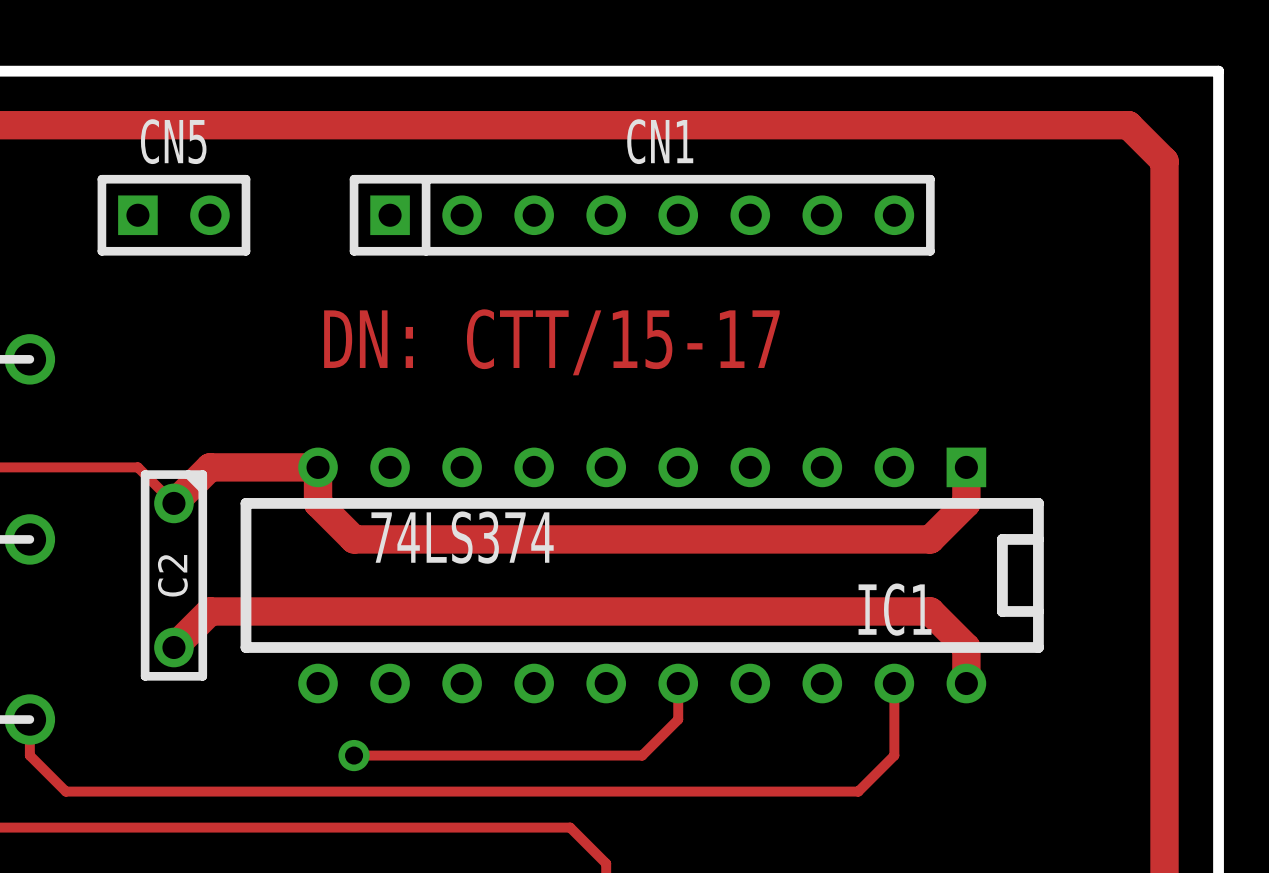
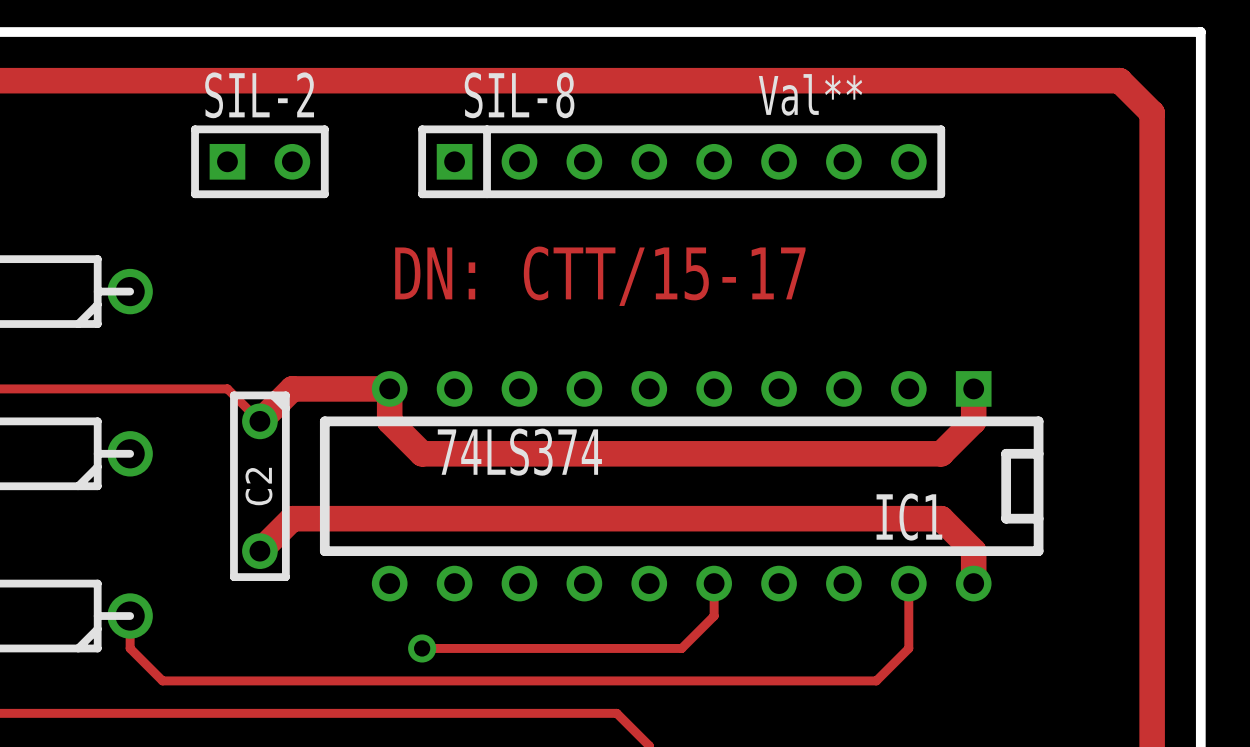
SIL-2 name: none -> SIL-2 (259, 95)
SIL-2 value: CN5 (173, 141) -> none
SIL-8 name: none -> SIL-8 (519, 95)
SIL-8 value: CN1 (660, 141) -> Val** (810, 94)

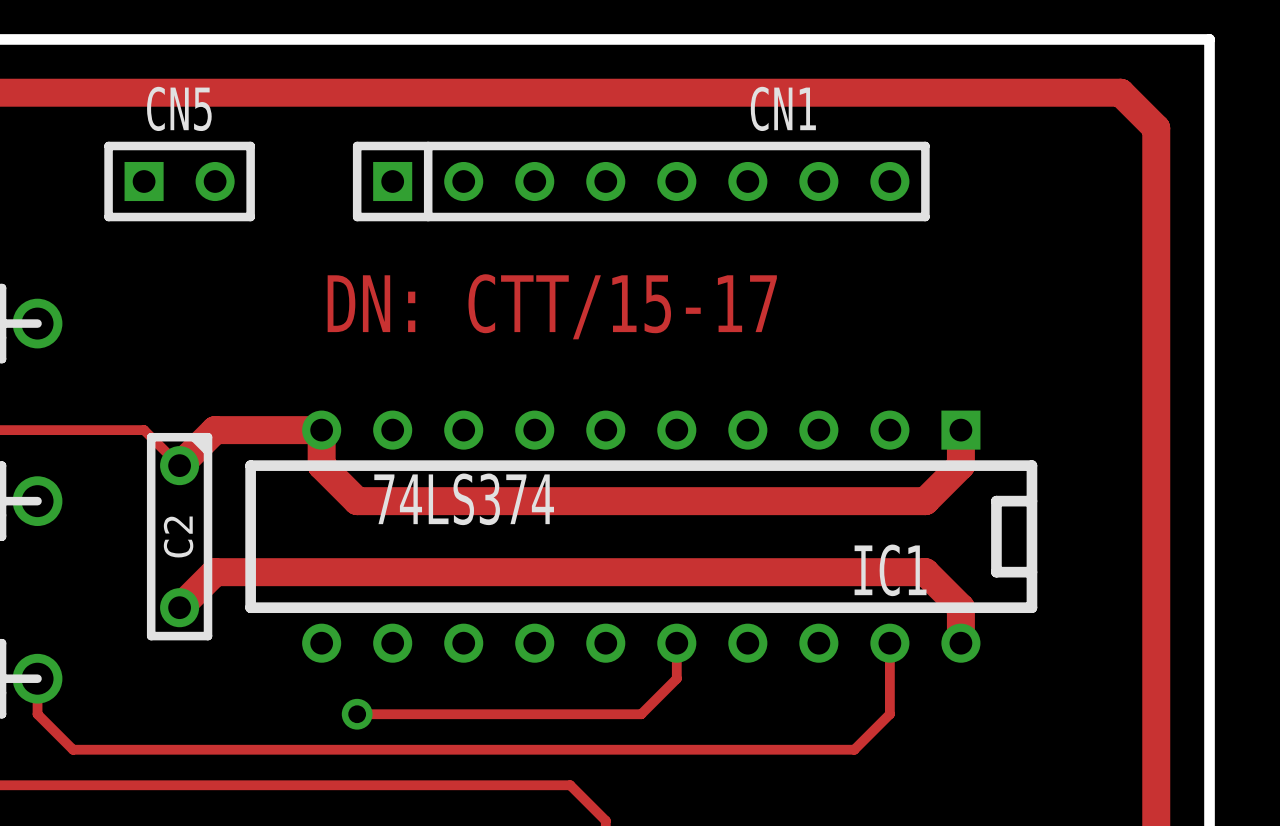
SIL-8 value: Val** (810, 94) -> CN1 (783, 108)
SIL-2 name: SIL-2 (259, 95) -> none
SIL-2 value: none -> CN5 (179, 108)
SIL-8 name: SIL-8 (519, 95) -> none

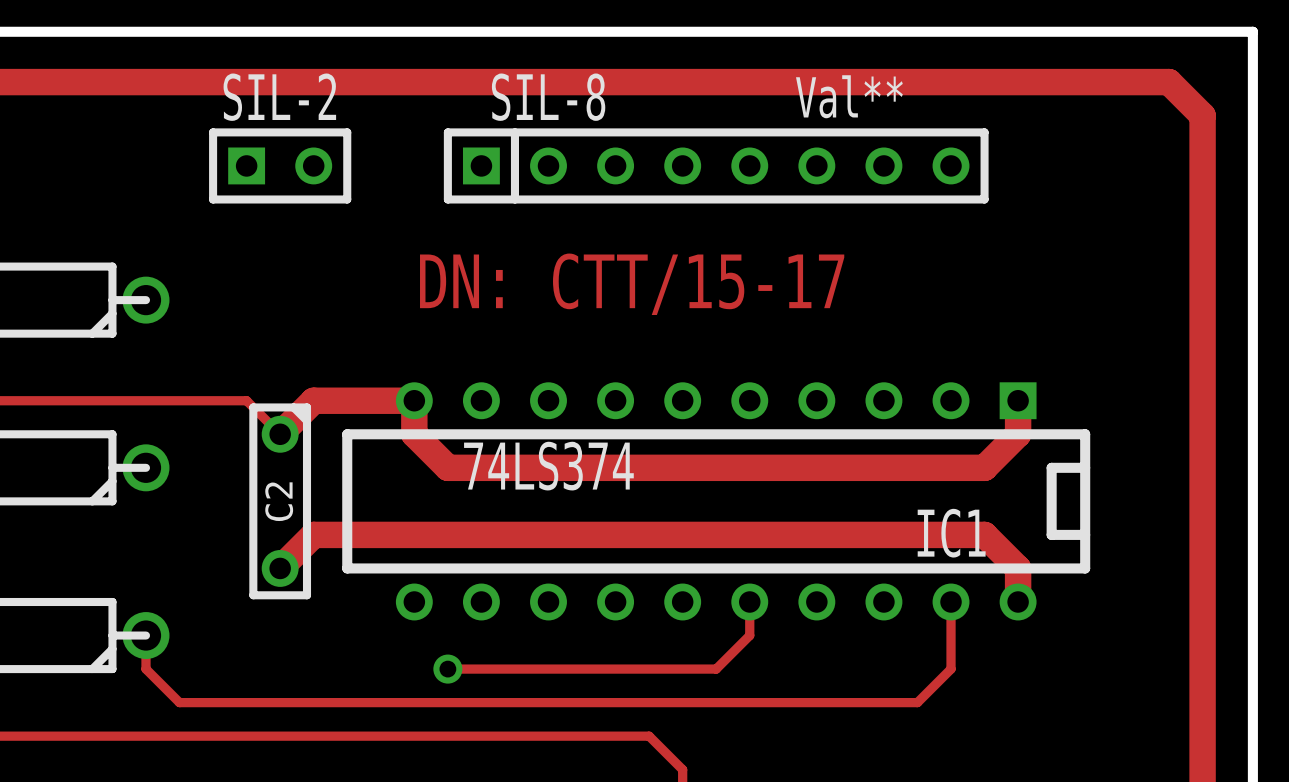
SIL-2 name: none -> SIL-2 (279, 97)
SIL-2 value: CN5 (179, 108) -> none
SIL-8 name: none -> SIL-8 (548, 97)
SIL-8 value: CN1 (783, 108) -> Val** (849, 96)

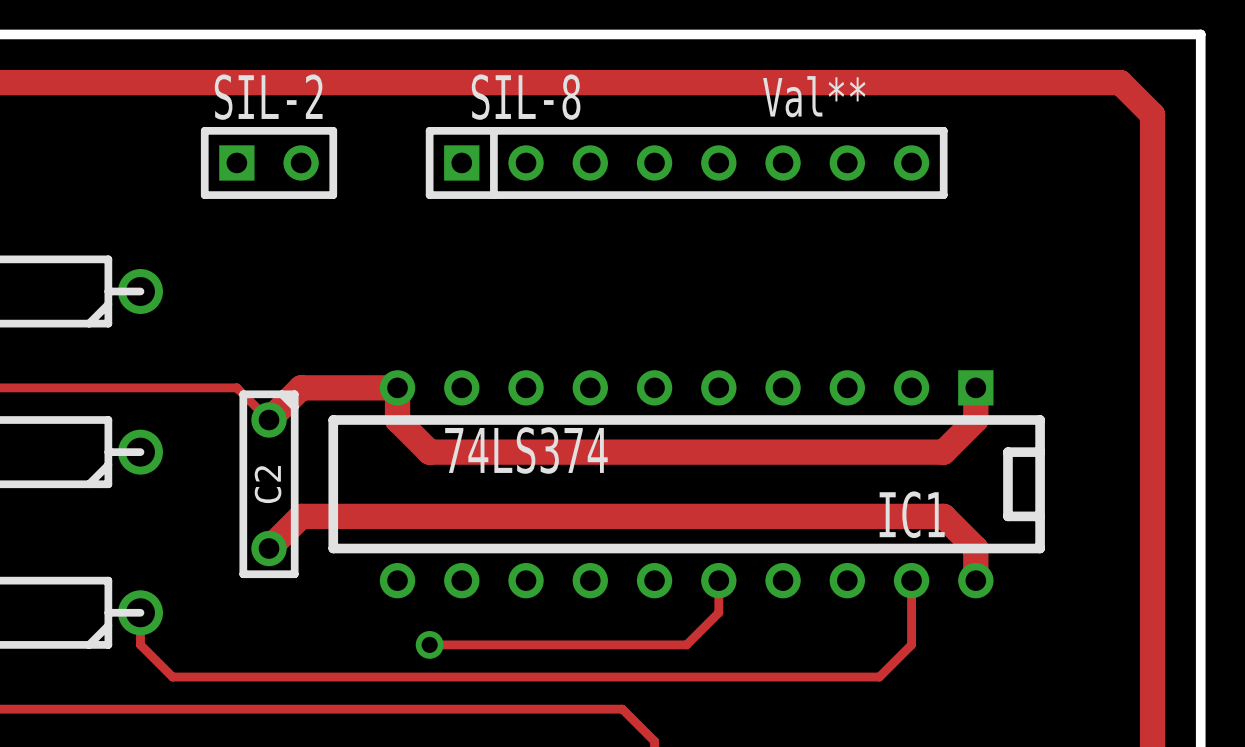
text: DN: CTT/15-17 (632, 284) -> none

